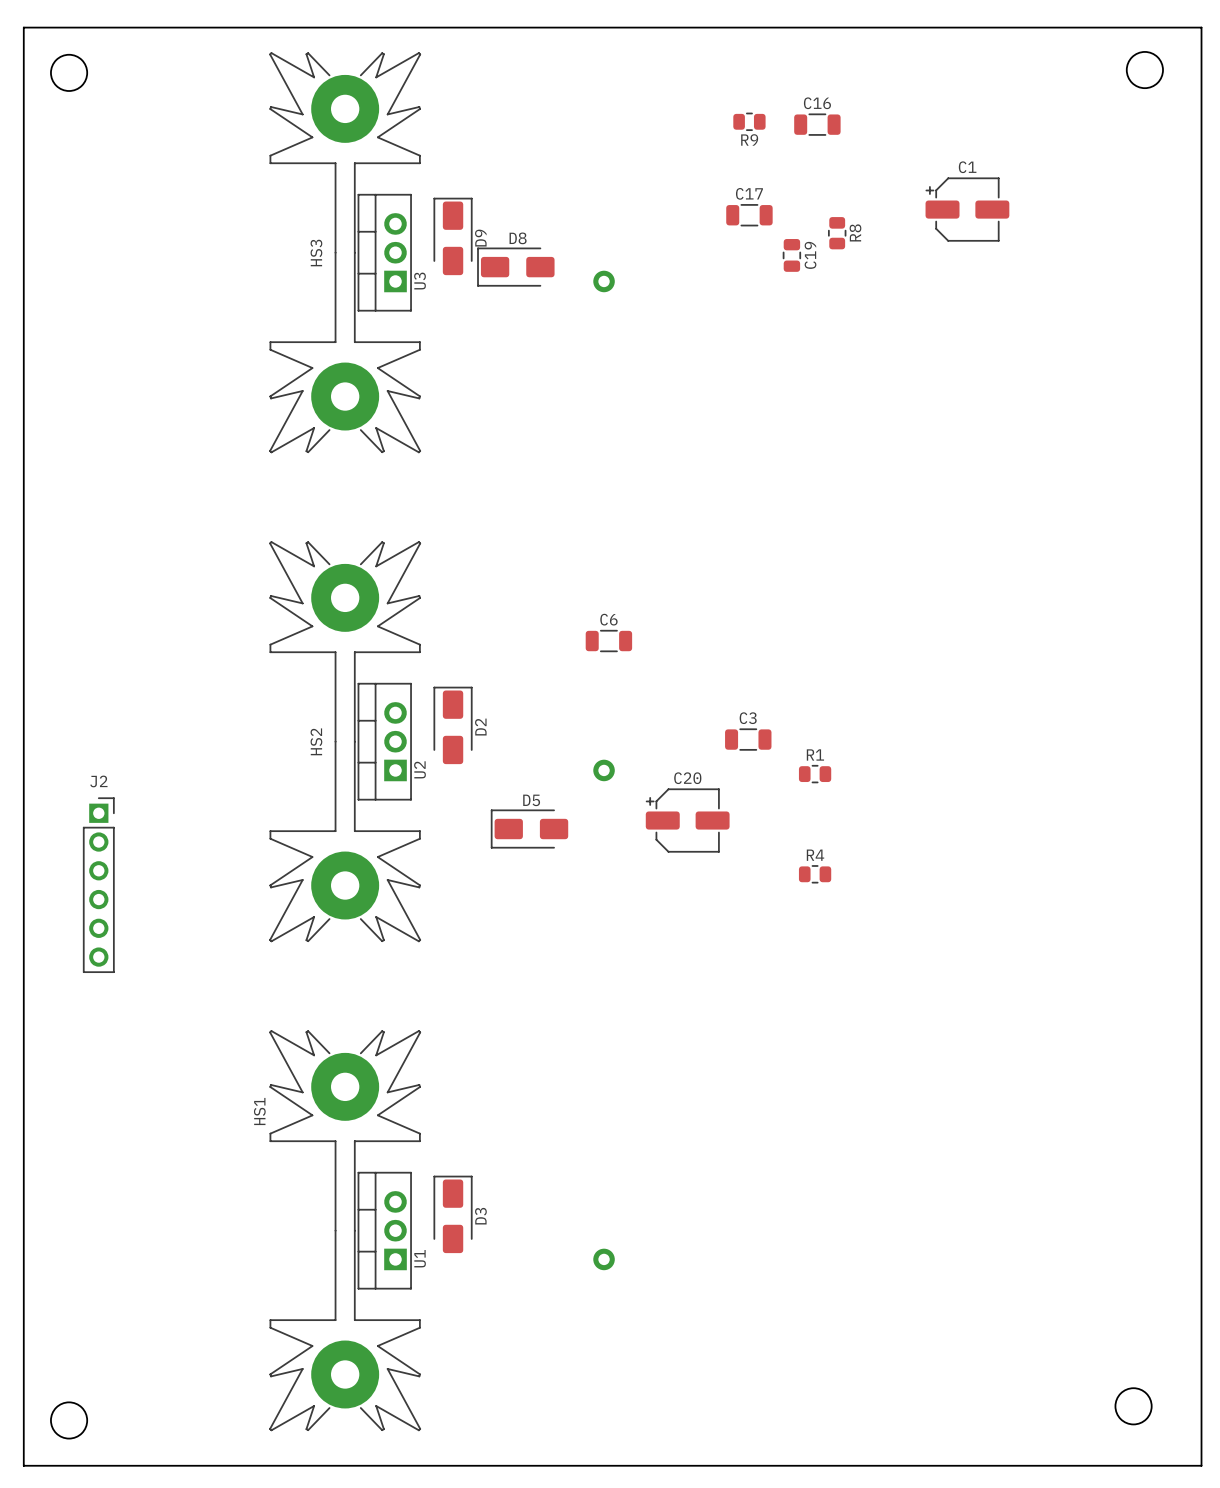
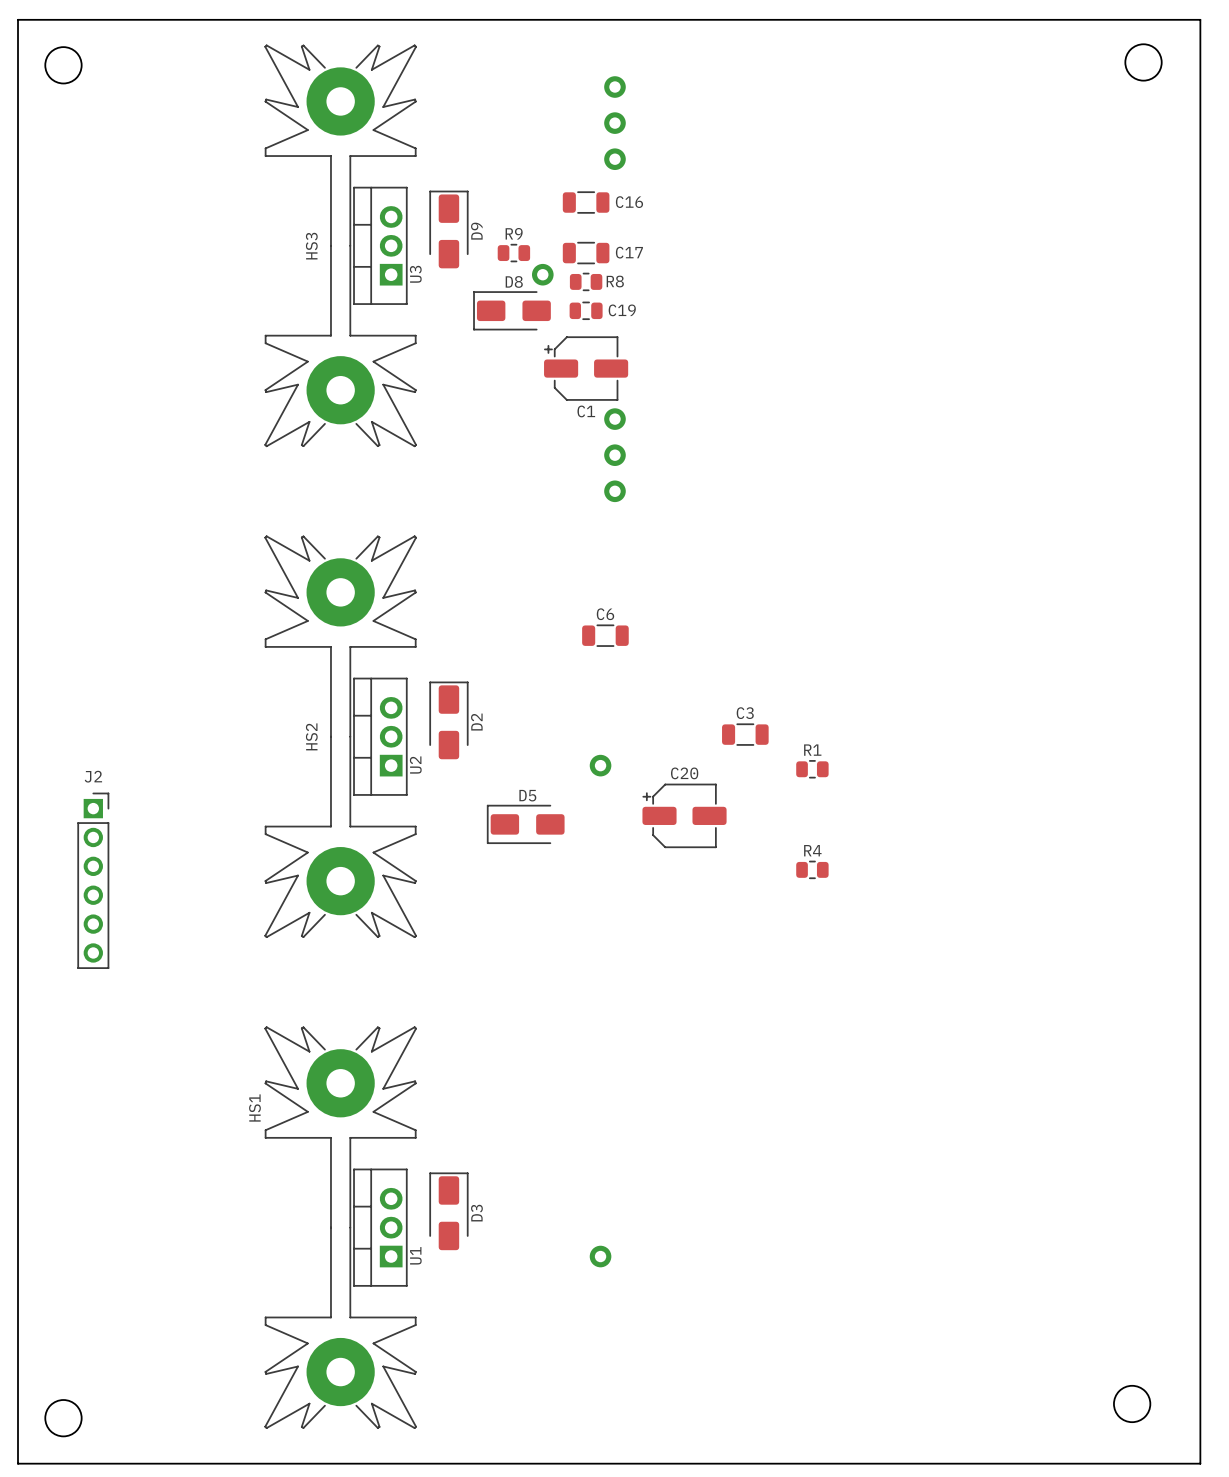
via: none -> (614, 87)
C16 name position: C16 (817, 103) -> C16 (629, 202)
R9 position: (749, 121) -> (513, 253)
C16 position: (817, 124) -> (586, 202)
via: none -> (614, 123)
R9 name position: R9 (749, 139) -> R9 (514, 233)
via: none -> (614, 159)
C1 name position: C1 (967, 167) -> C1 (586, 411)
C17 name position: C17 (749, 193) -> C17 (629, 252)
C1 position: (967, 209) -> (586, 368)
C17 position: (749, 215) -> (586, 253)
R8 rotation: 0° (837, 233) -> 90° clockwise (586, 281)
R8 position: (837, 233) -> (586, 281)
C19 rotation: 0° (791, 255) -> 90° clockwise (586, 310)
C19 position: (791, 255) -> (586, 310)
D8 position: (515, 267) -> (512, 310)
via position: (604, 281) -> (542, 274)
via: none -> (614, 419)
via: none -> (614, 455)
via: none -> (614, 491)

